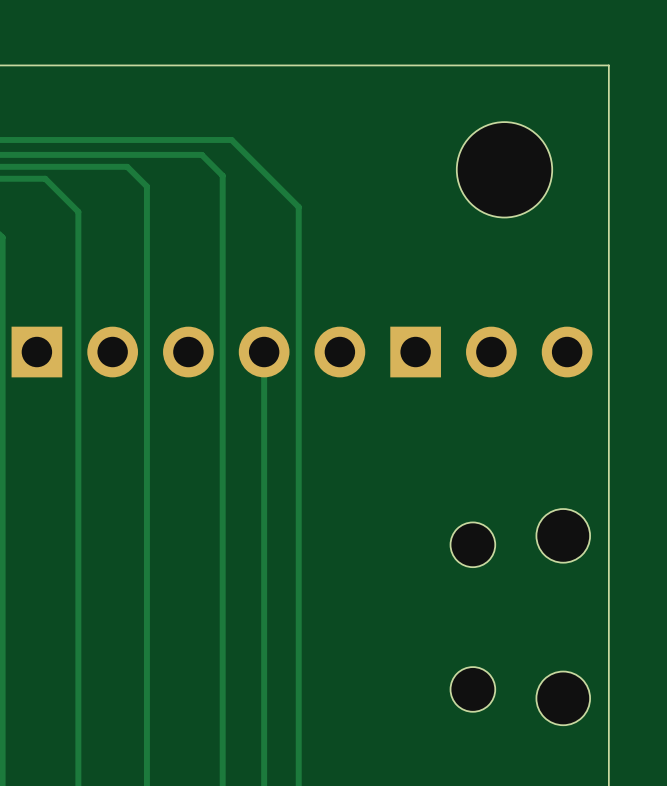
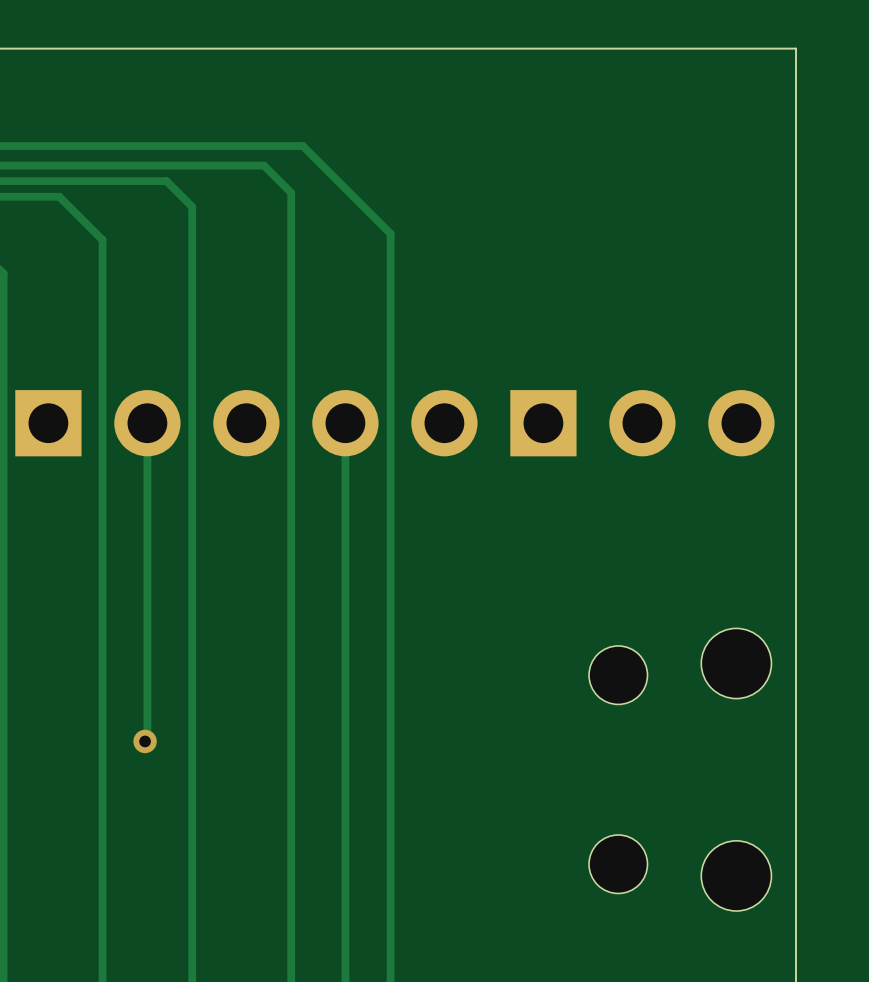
part: (504, 169) -> none
track: none -> (147, 423) (147, 739) (145, 741)
via: none -> (145, 741)

